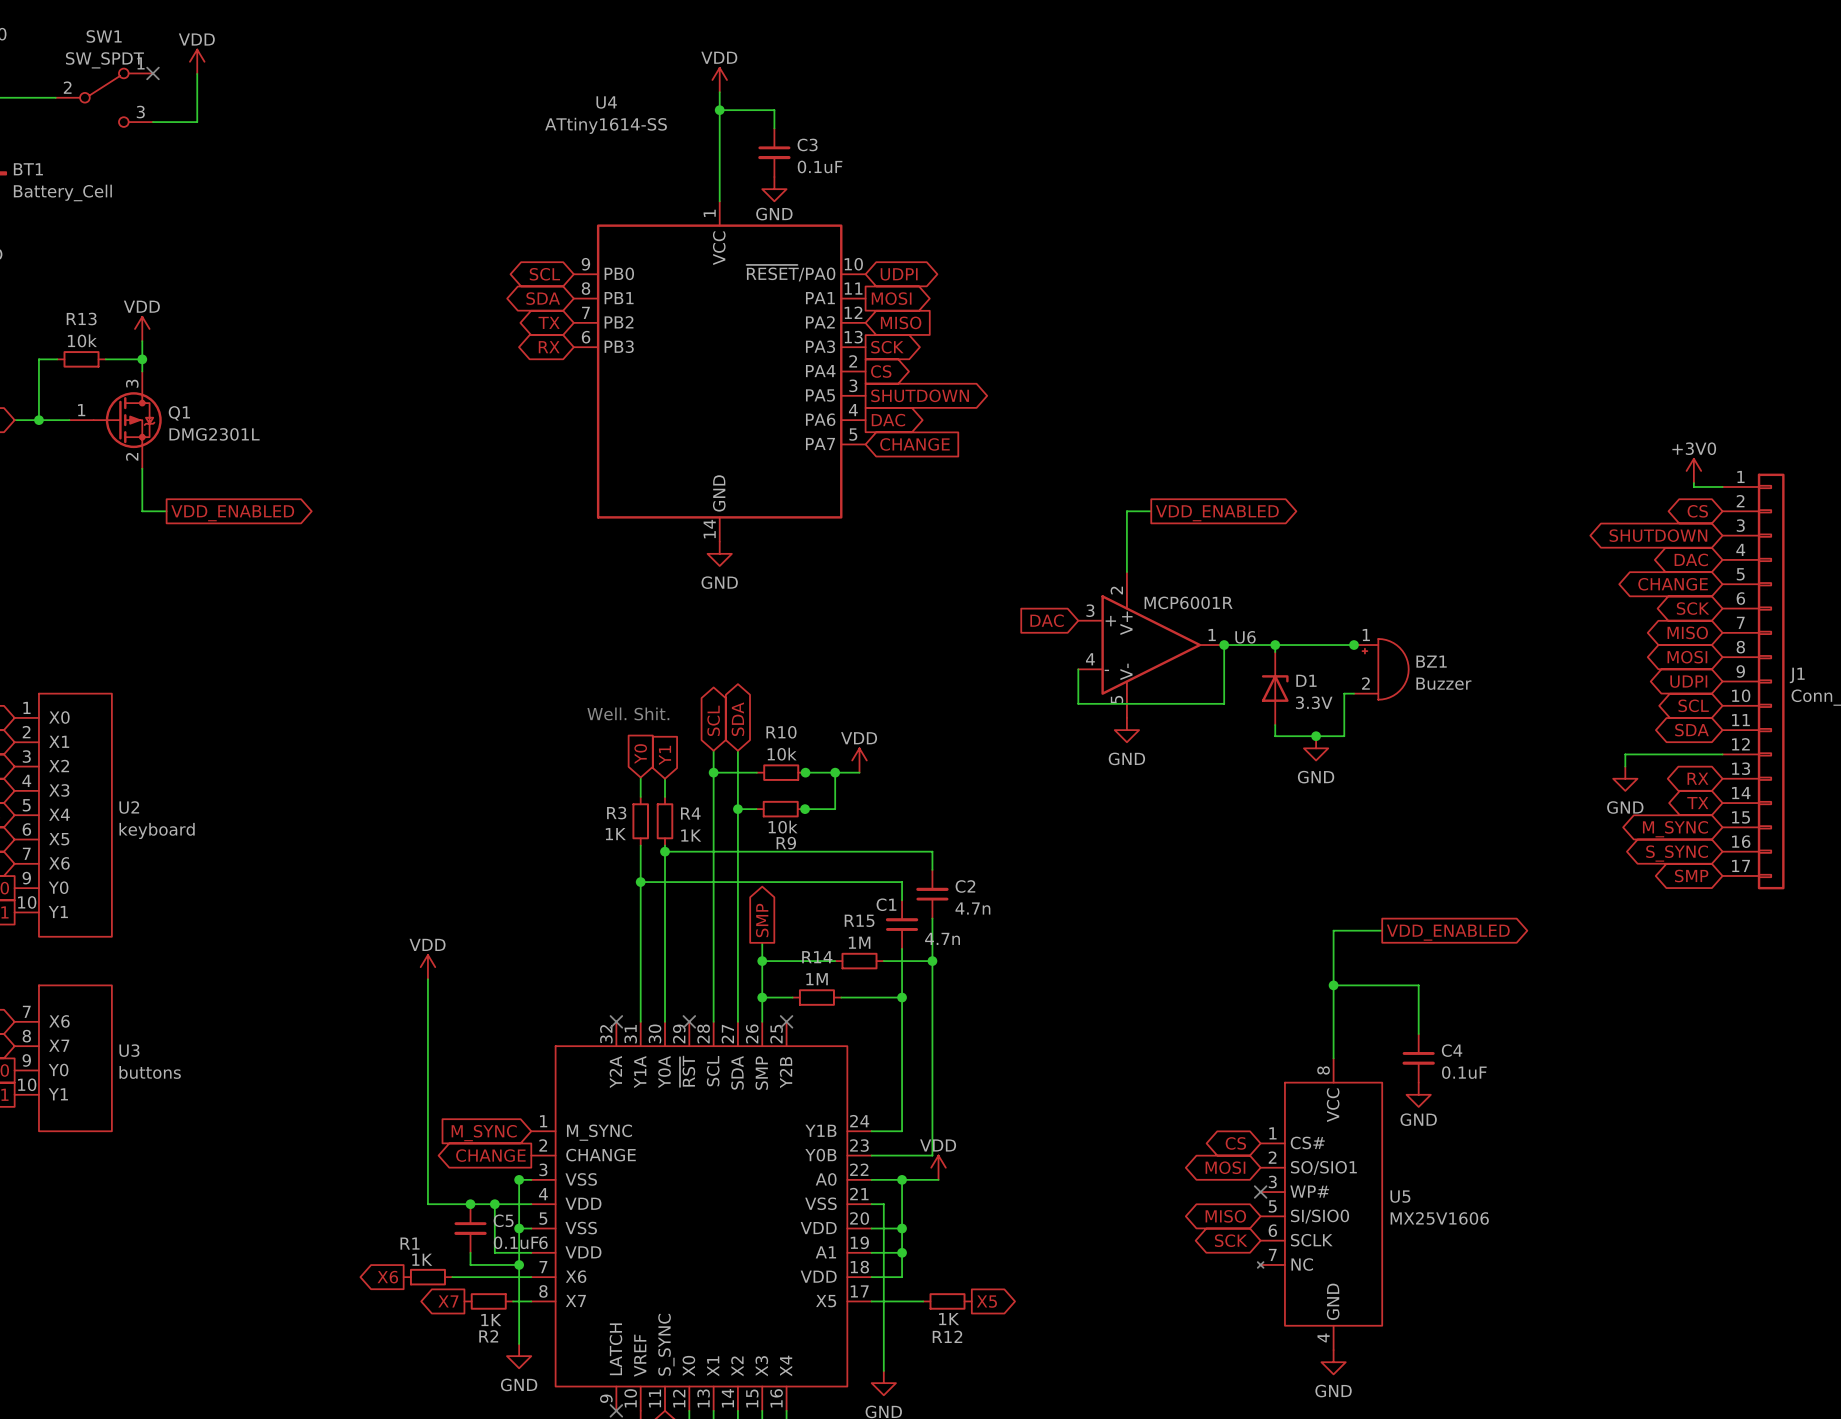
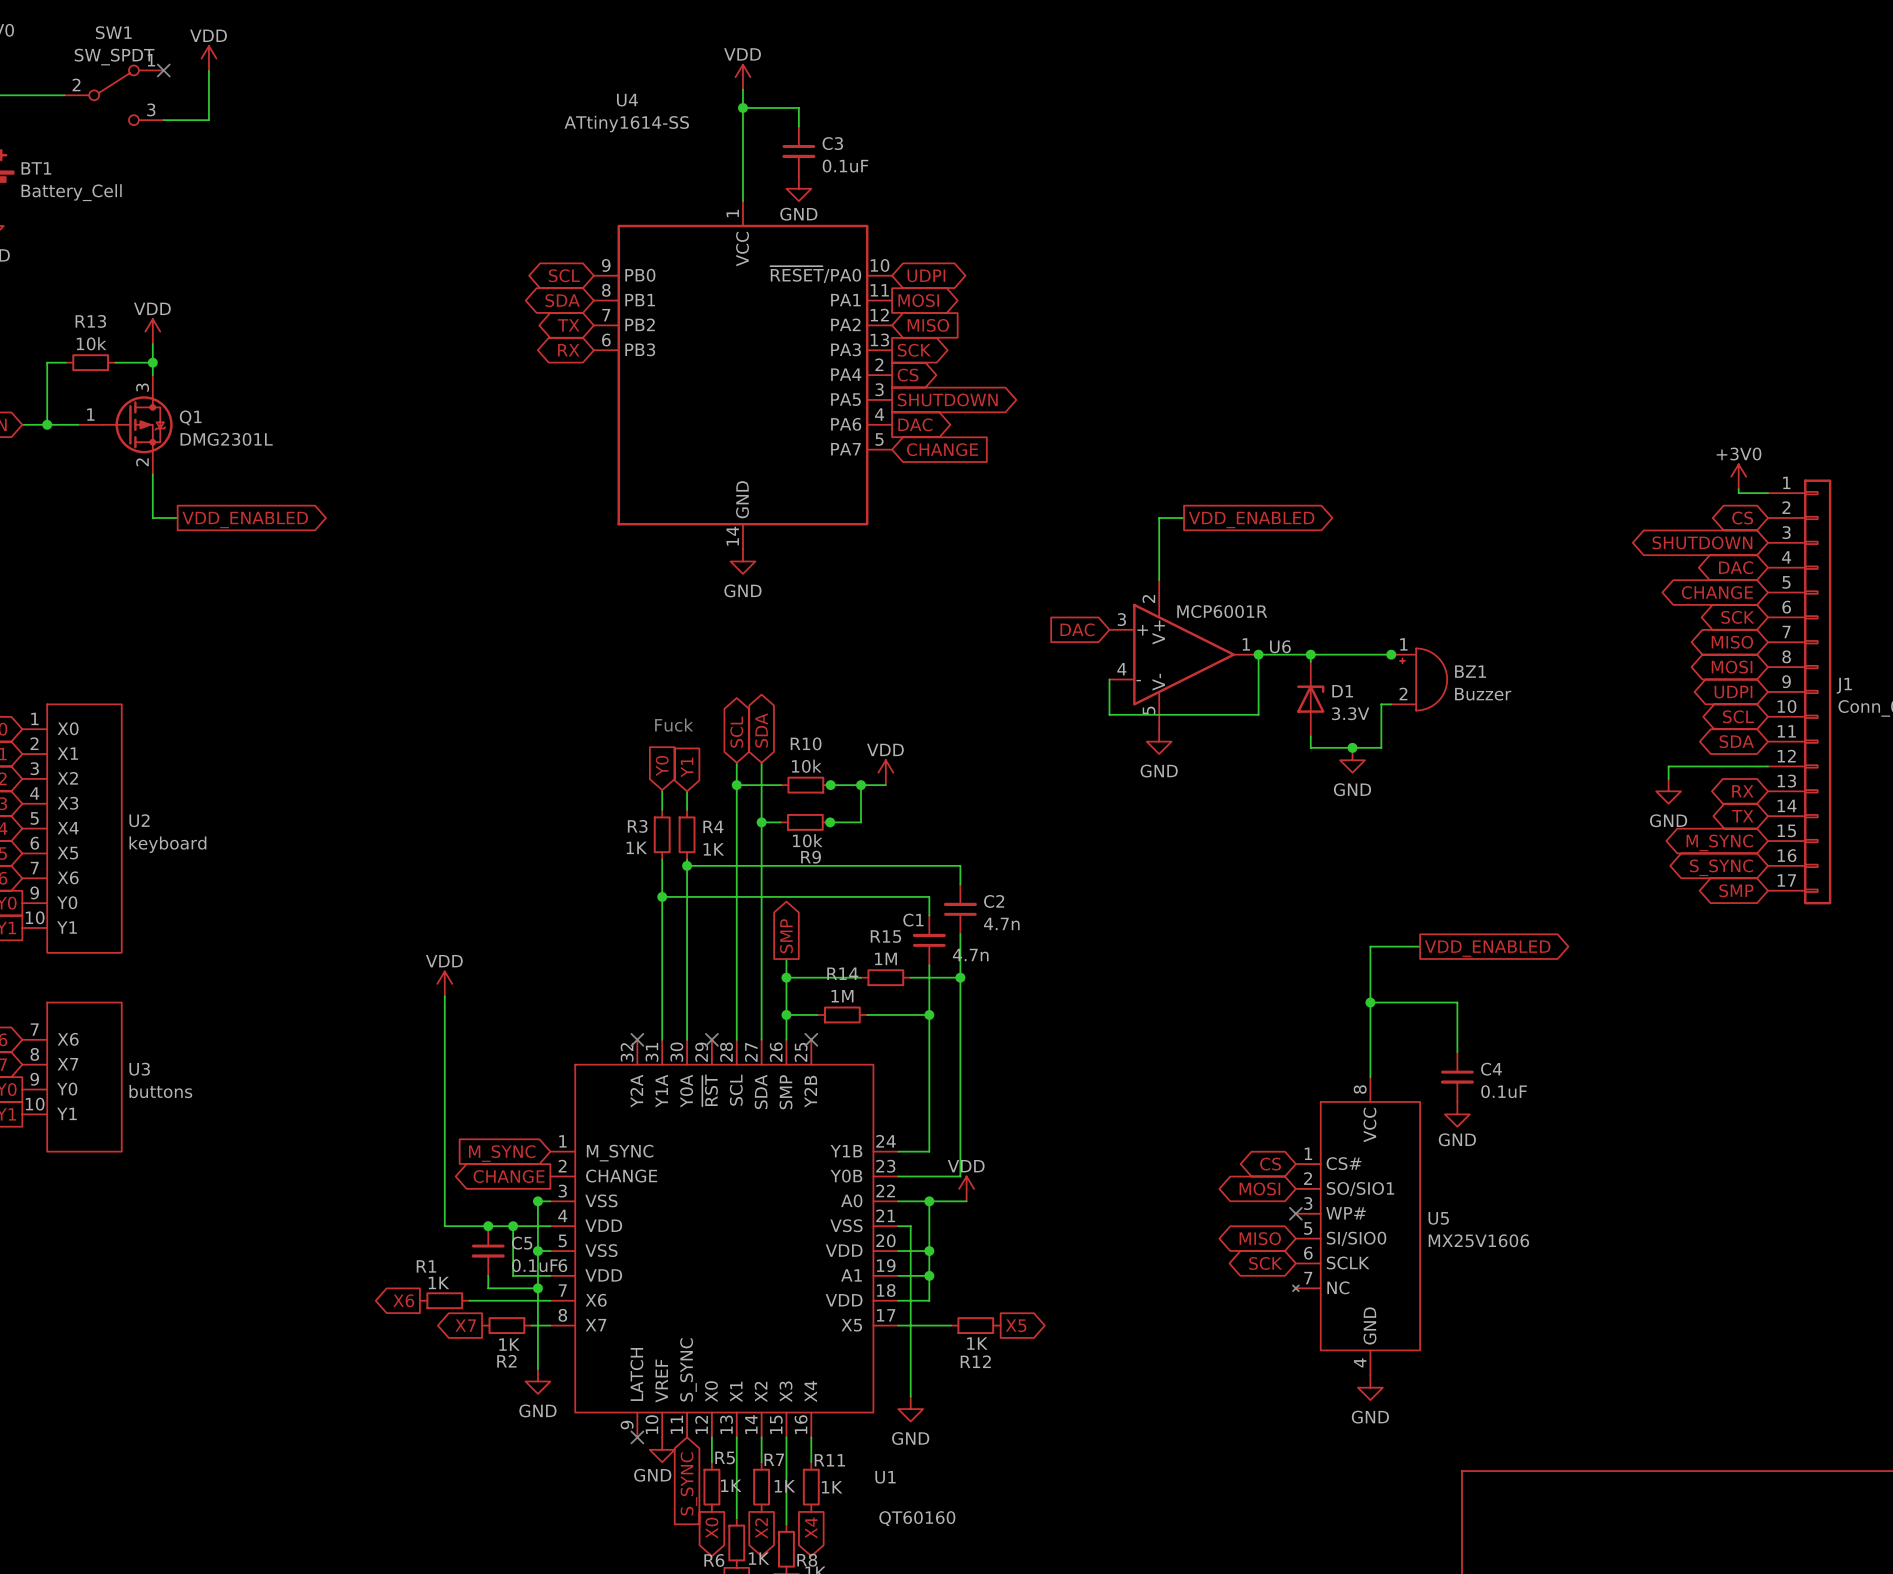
text: Well. Shit. (628, 713) -> Fuck (674, 725)

